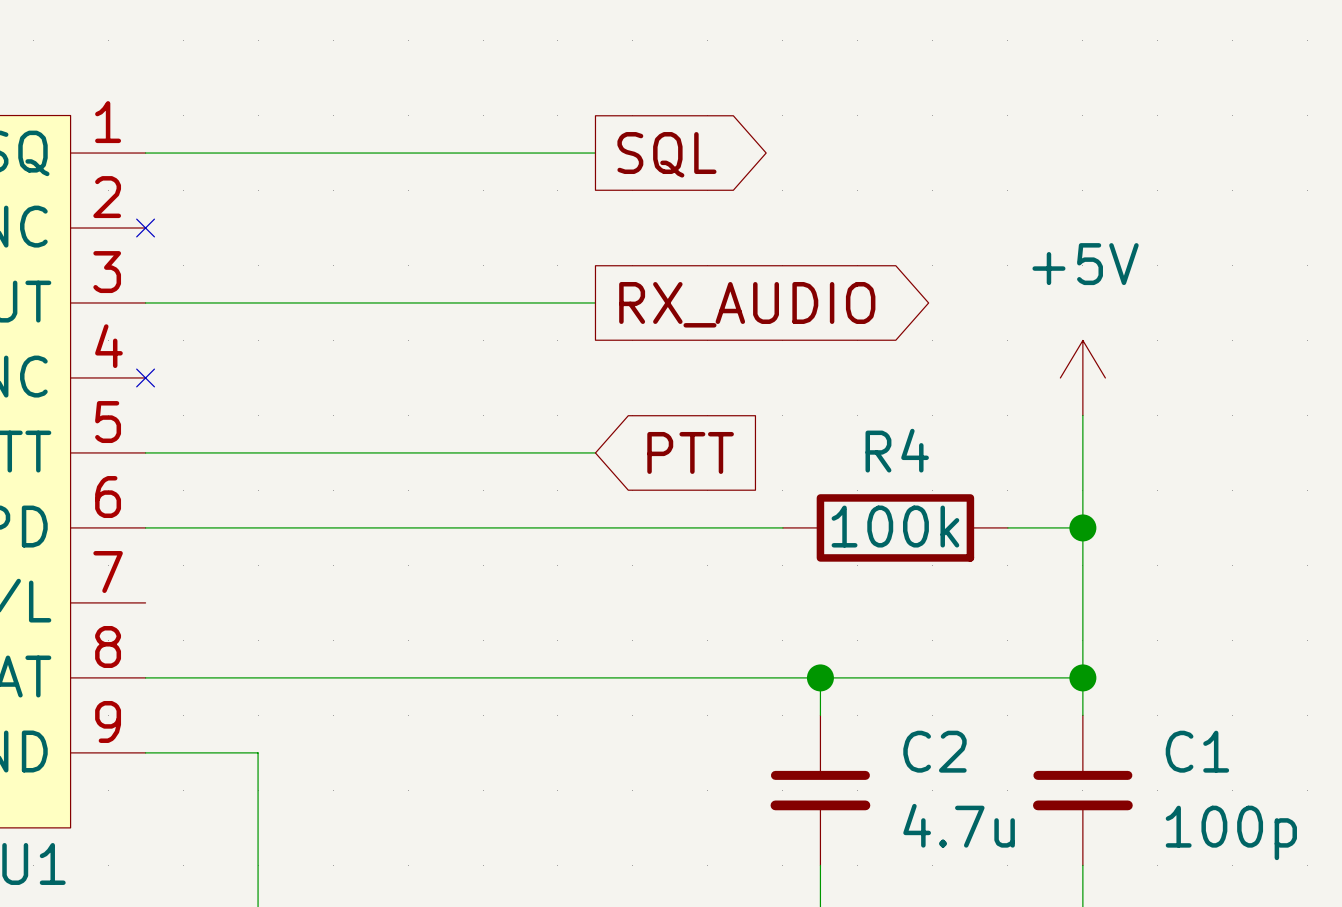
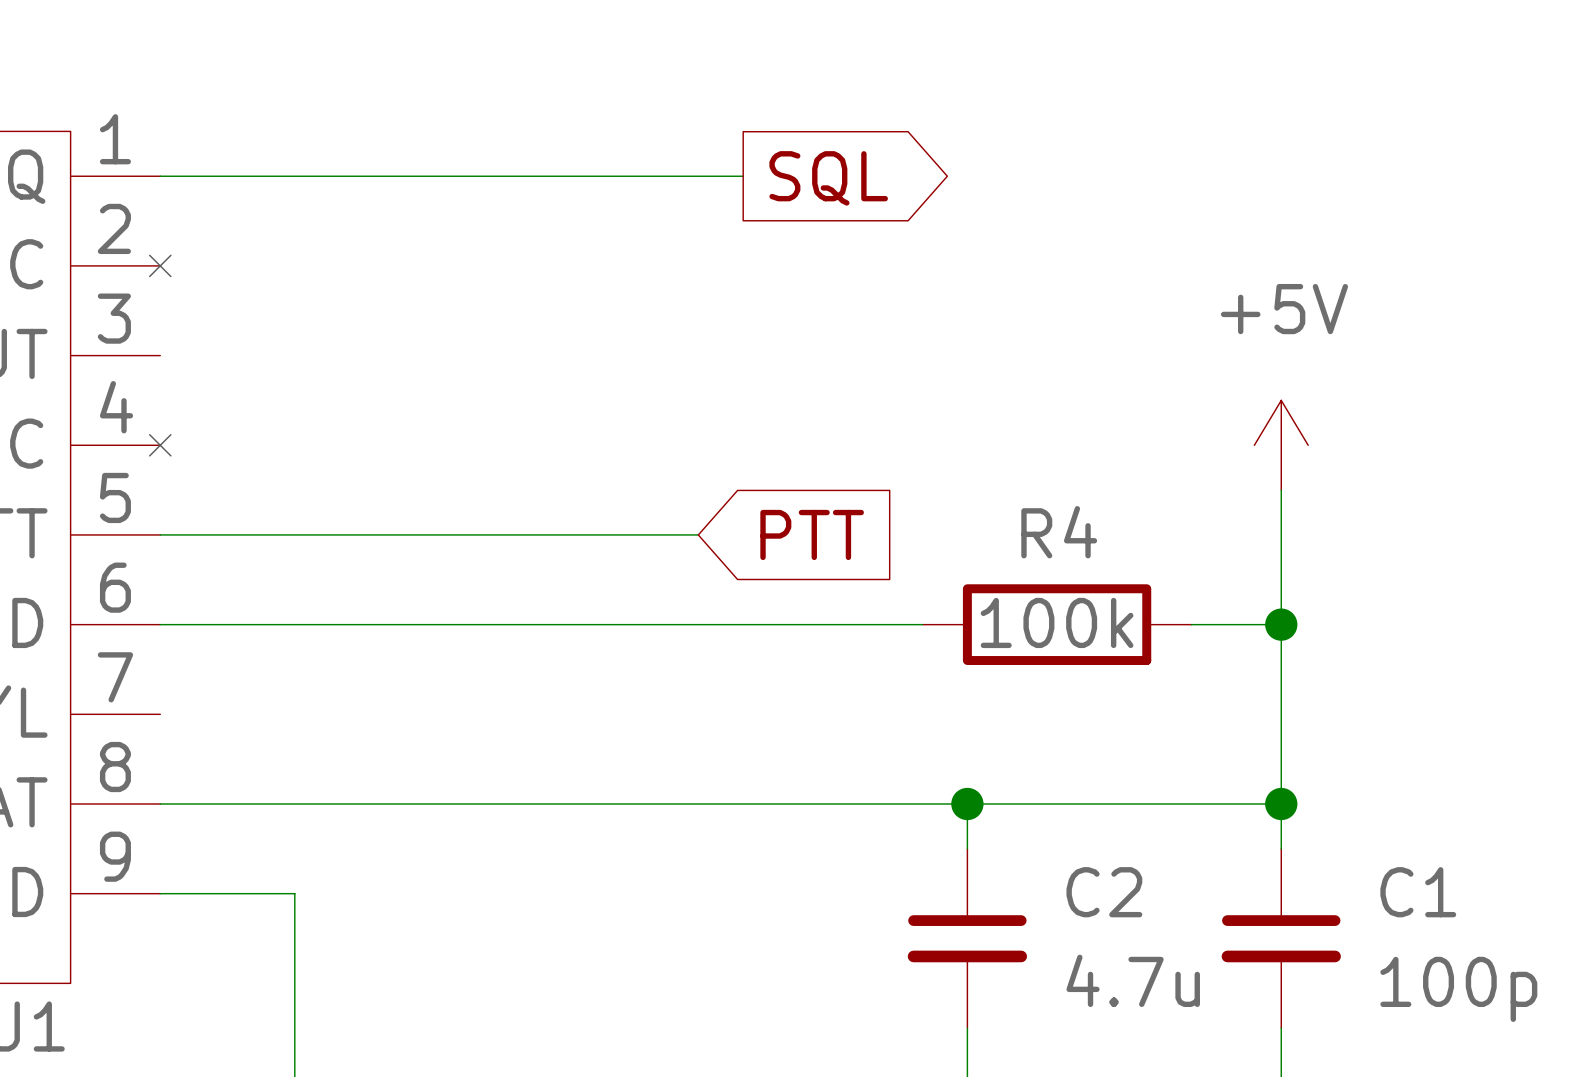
wire: none -> (698, 176) (743, 176)
global label position: SQL (666, 154) -> SQL (828, 178)
wire: (145, 302) (595, 302) -> none
global label: RX_AUDIO (747, 304) -> none

